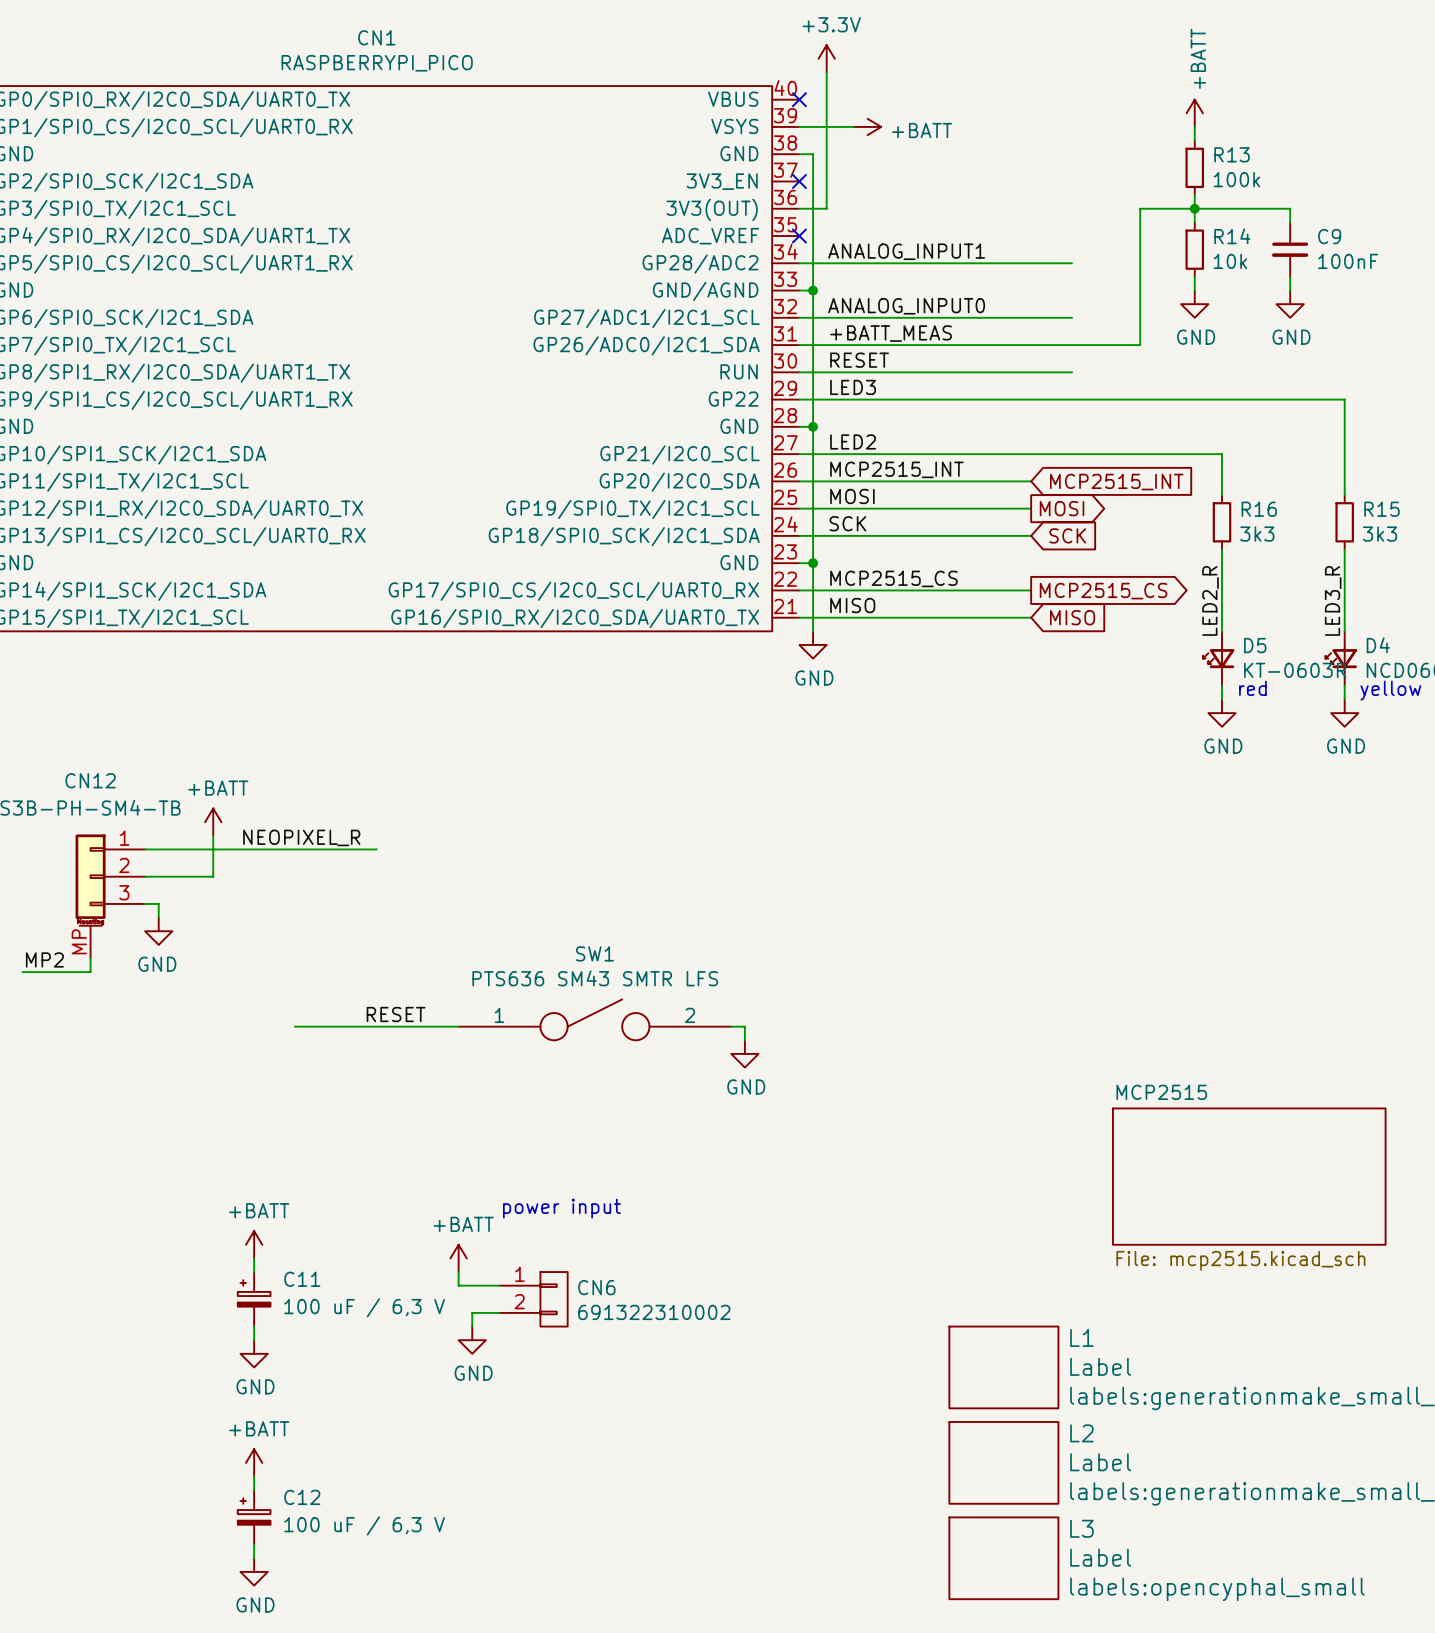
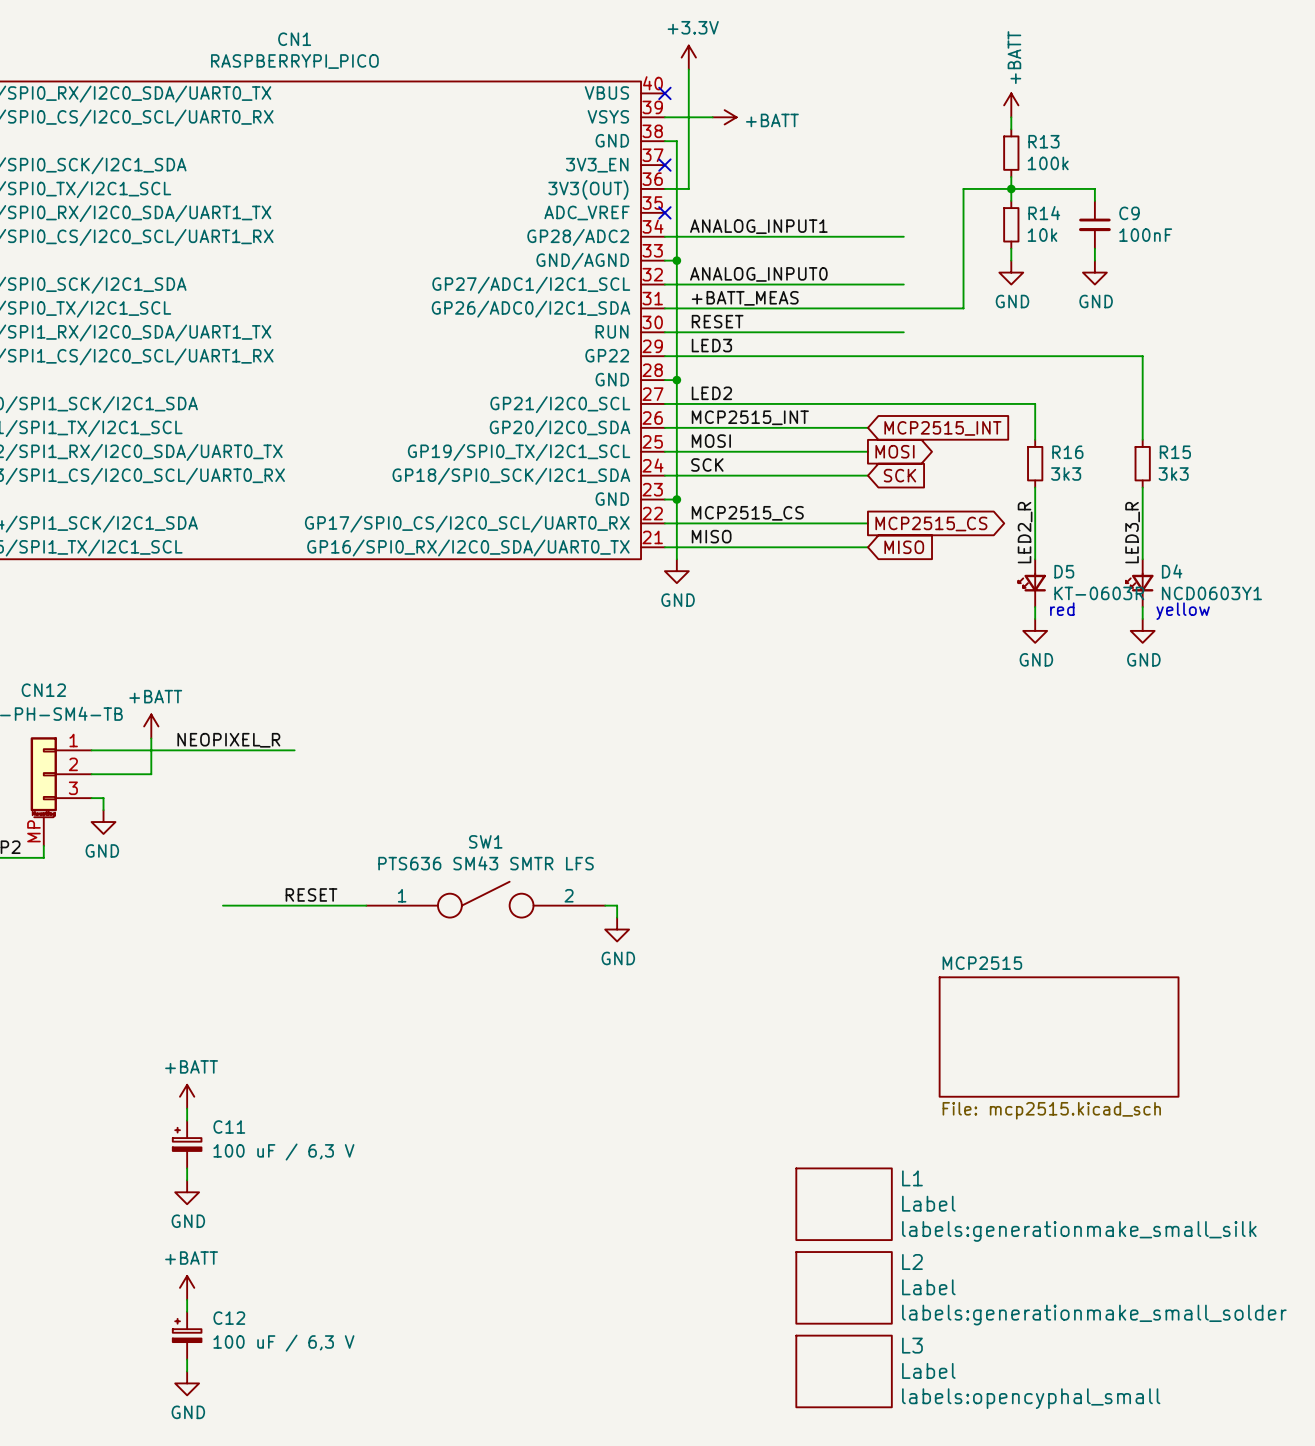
text: power input (561, 1208) -> none
power symbol: +BATT (458, 1258) -> none
wire: (458, 1272) (458, 1285) (499, 1285) -> none
CN6: 691322310002 (533, 1299) -> none
wire: (499, 1312) (472, 1312) (472, 1326) -> none
power symbol: GND (472, 1340) -> none

